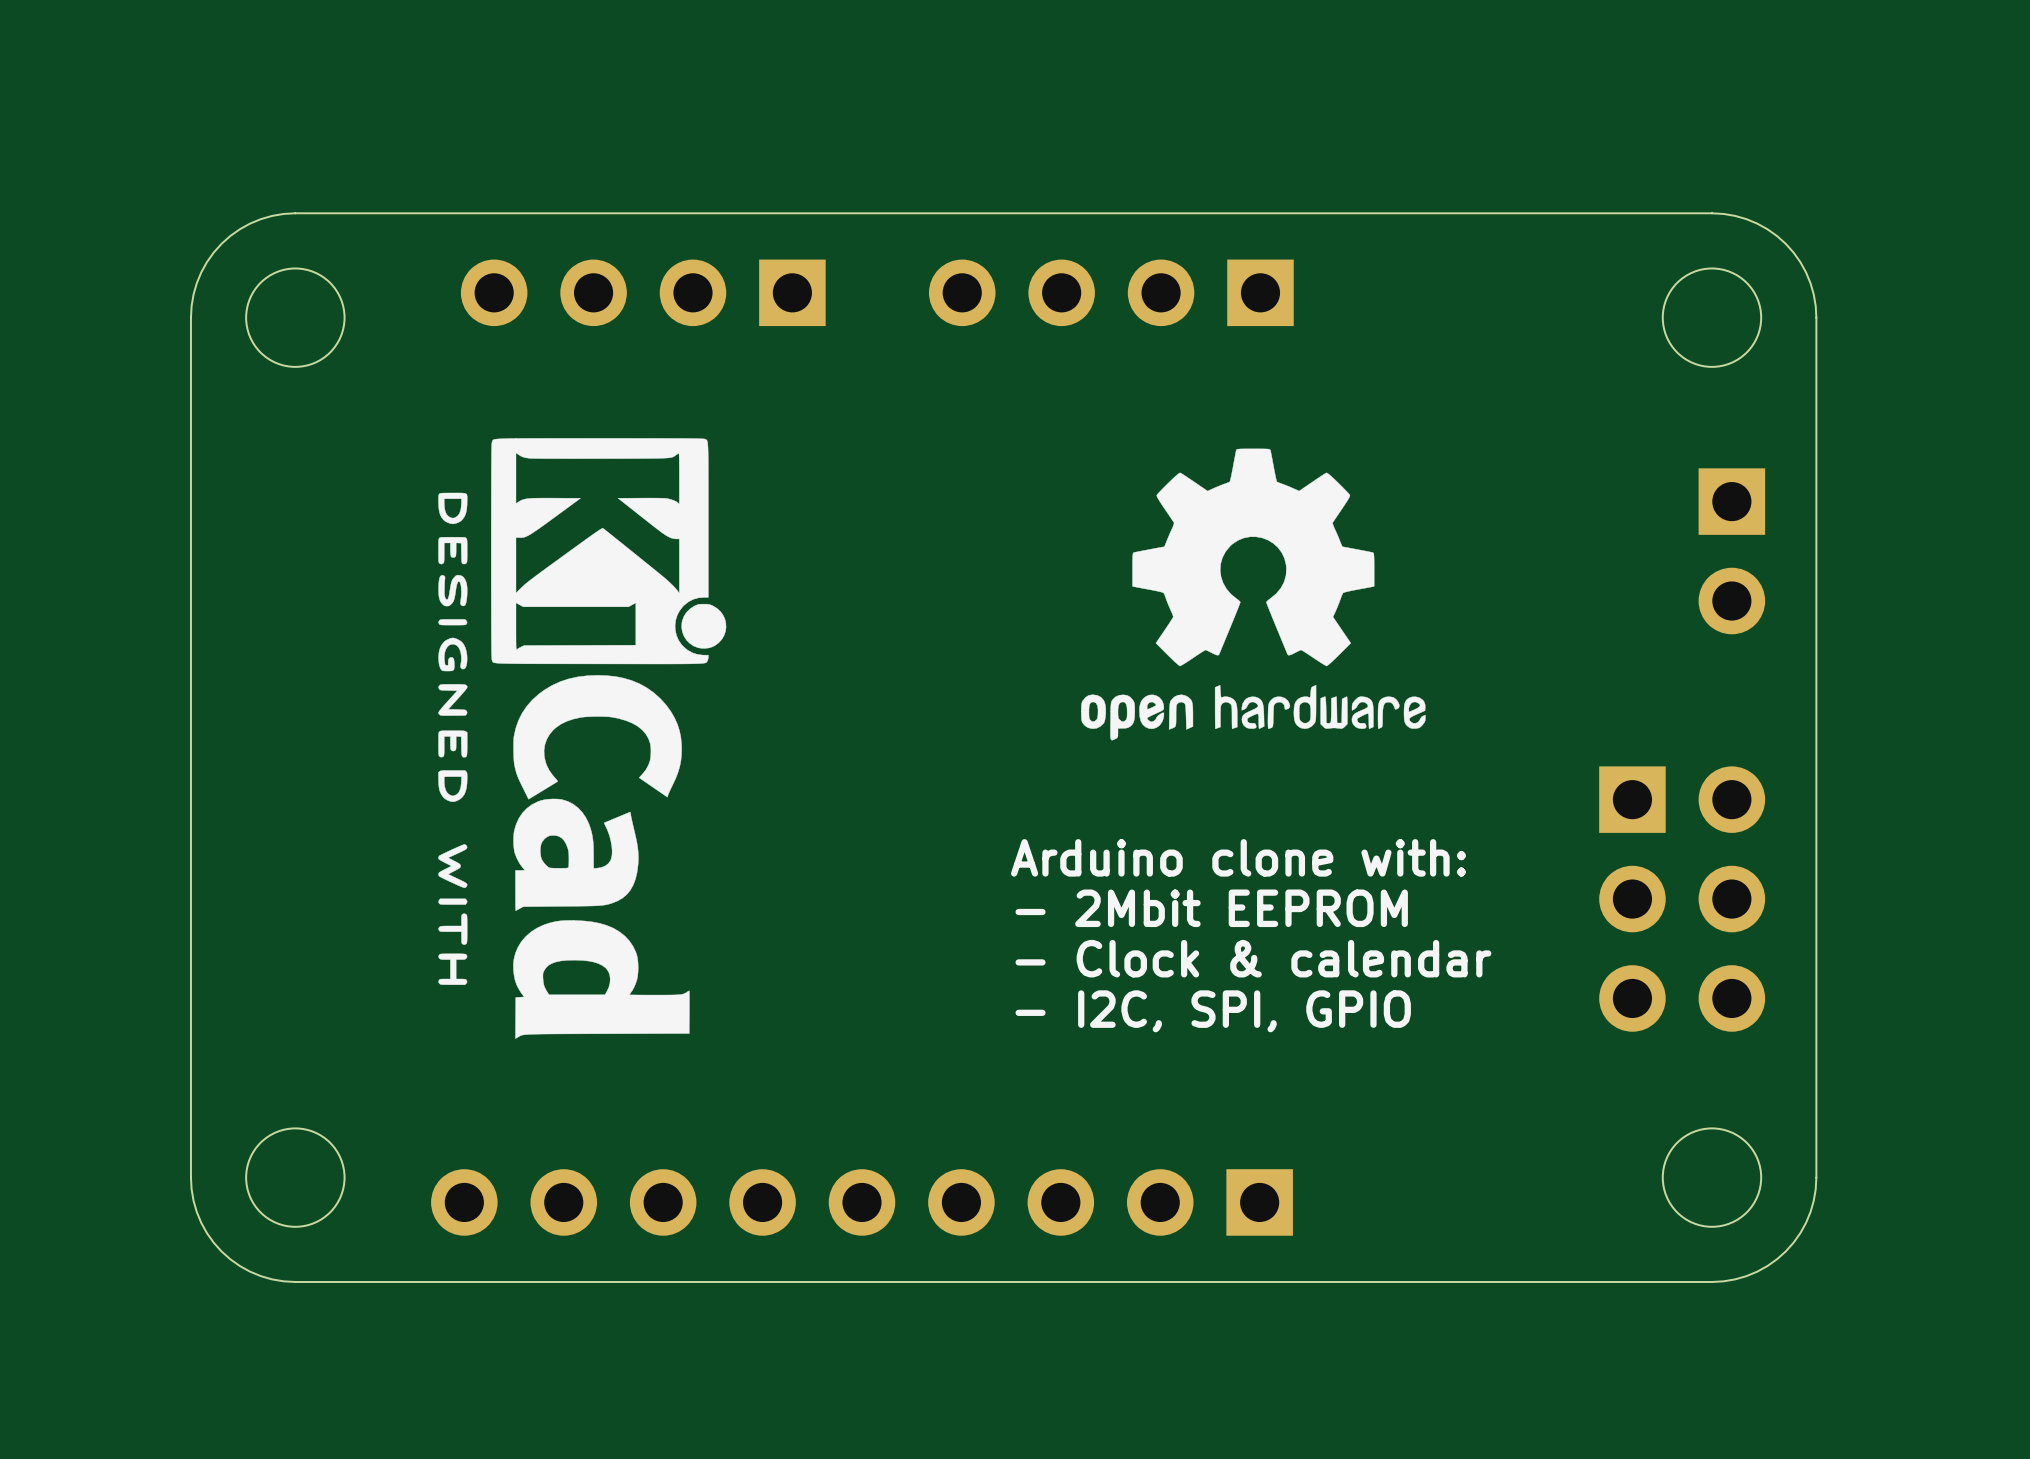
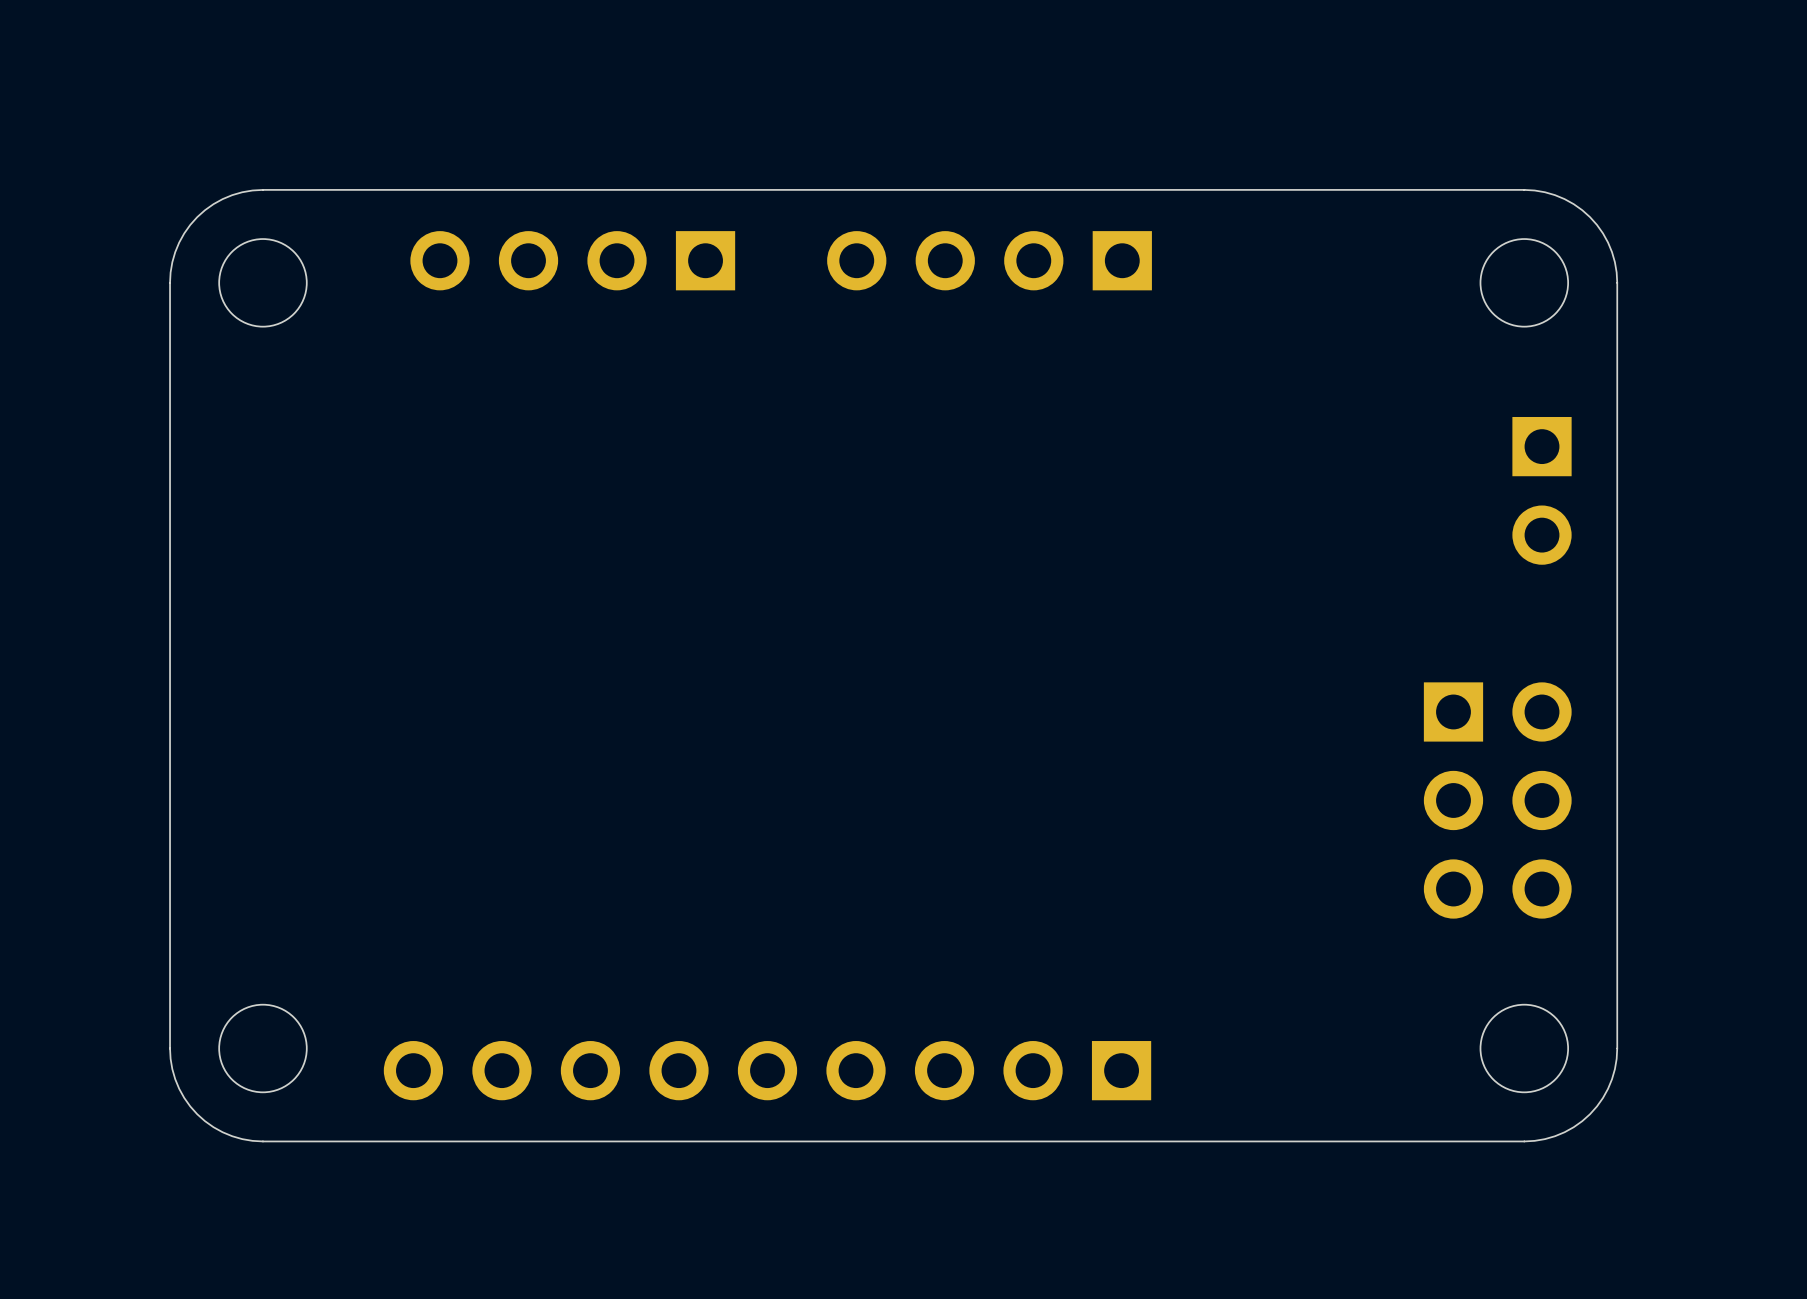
drawing: [438, 438, 727, 1039] -> none
drawing: [1081, 448, 1426, 741] -> none
text: Arduino clone with: (1238, 857) -> none
text: - 2Mbit EEPROM (1211, 908) -> none
text: - Clock & calendar (1253, 958) -> none
text: - I2C, SPI, GPIO (1213, 1011) -> none

